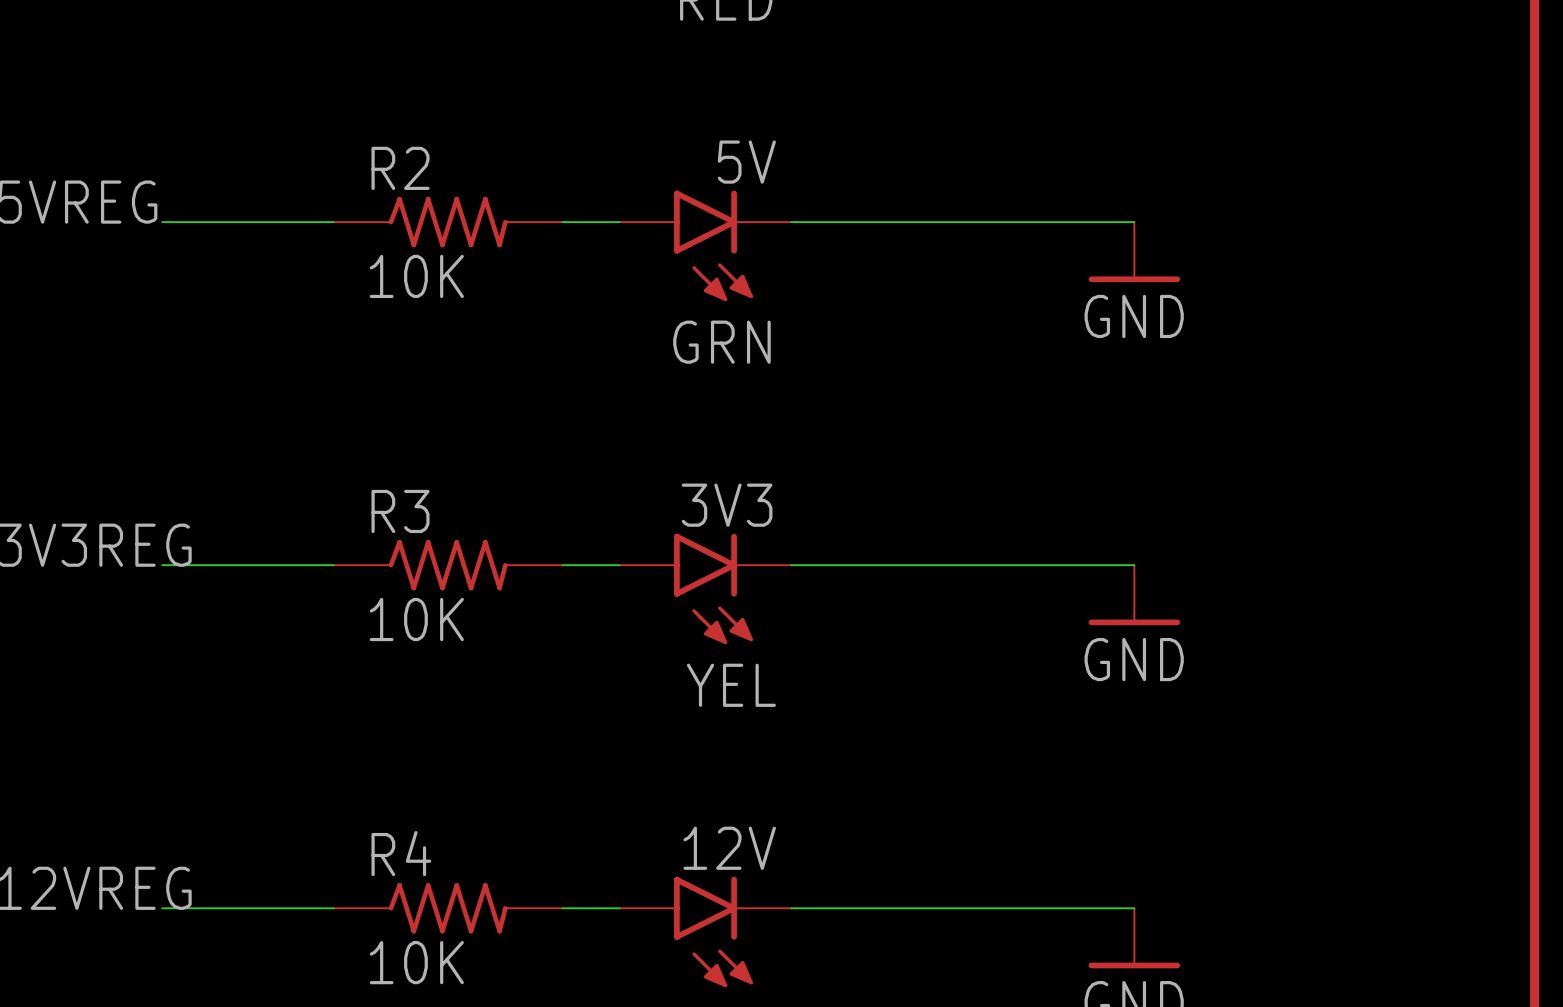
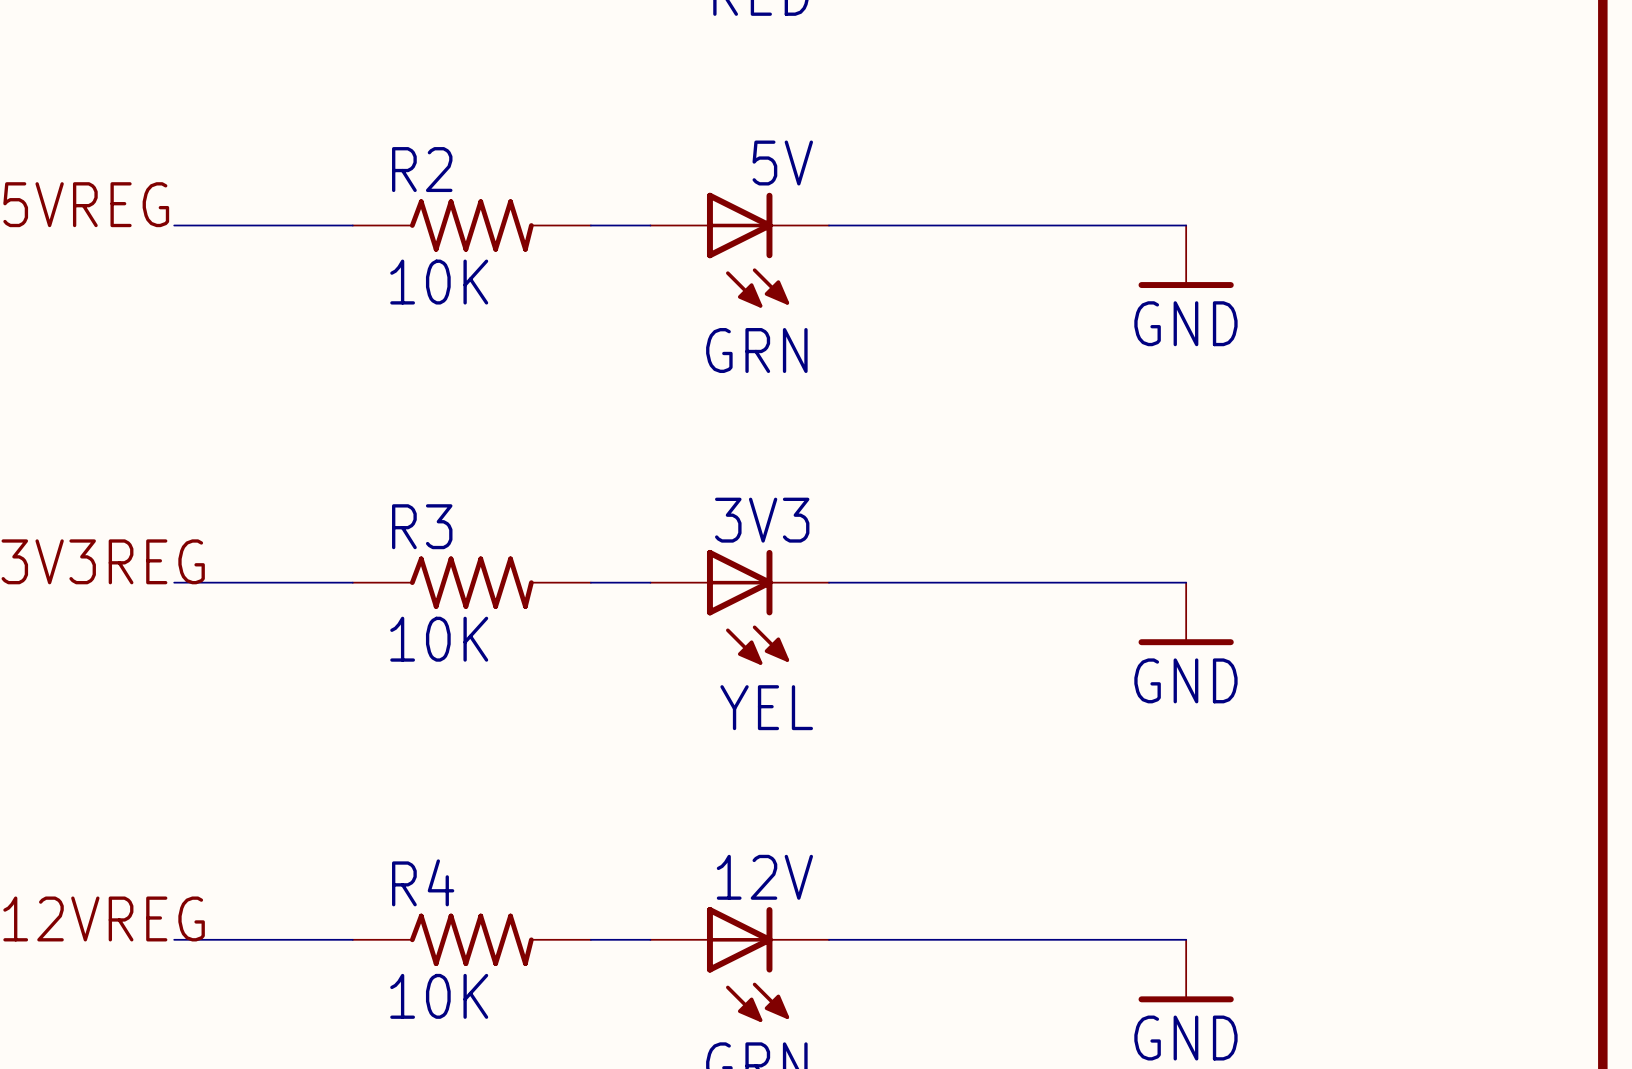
5V symbol: [619, 190, 792, 302] -> [650, 192, 830, 308]
3V3 symbol: [619, 533, 792, 645] -> [650, 549, 830, 665]
12V symbol: [619, 876, 792, 988] -> [650, 907, 830, 1022]

